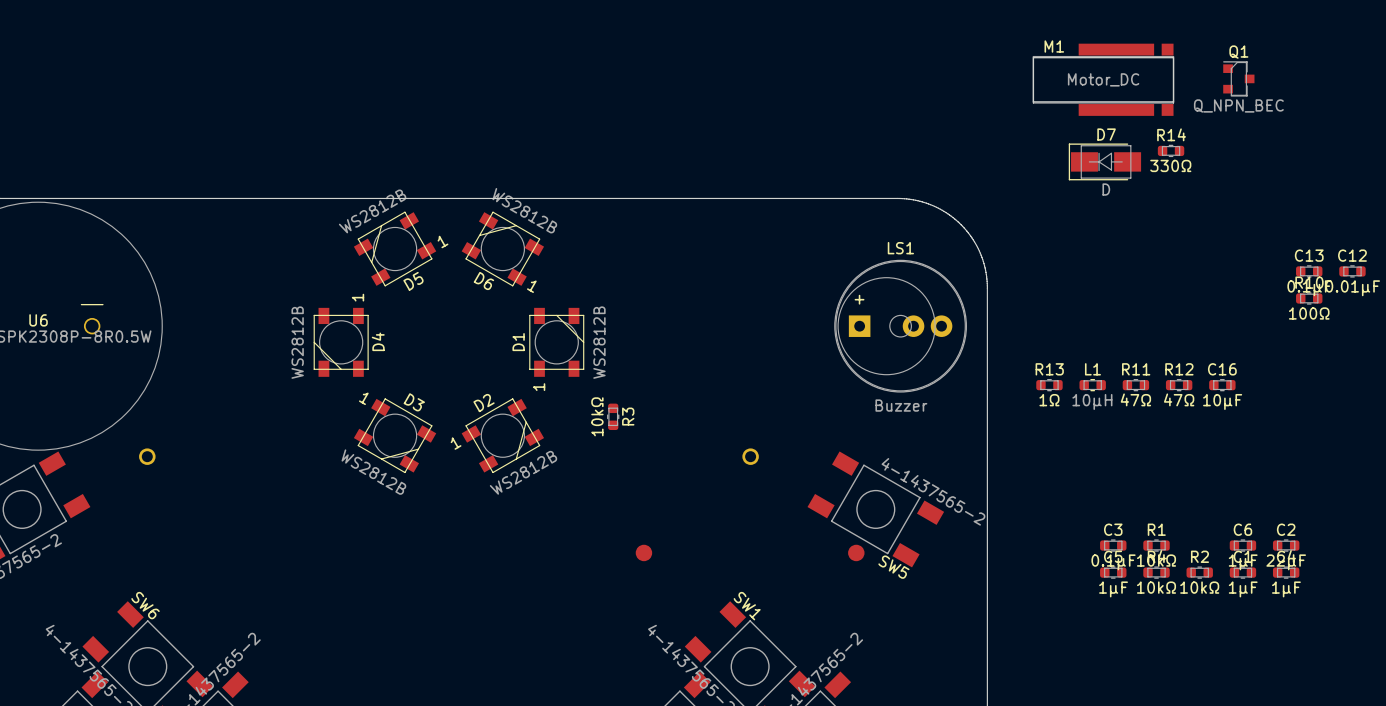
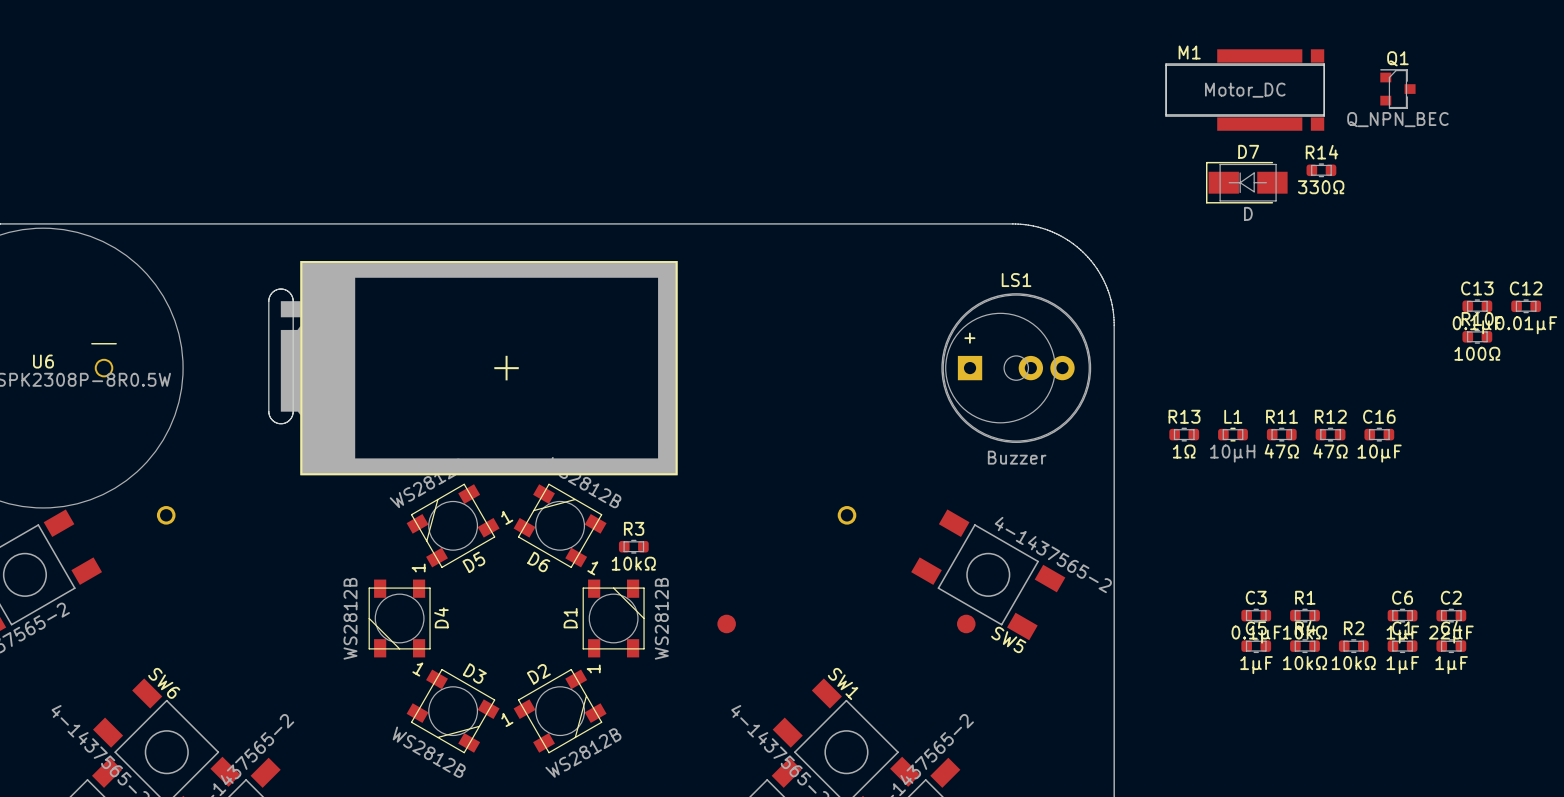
D5 position: (395, 249) -> (453, 525)
D6 position: (502, 249) -> (560, 525)
part: none -> (472, 368)
D4 position: (341, 342) -> (399, 618)
D1 position: (556, 342) -> (613, 618)
R3 value position: 10kΩ (597, 416) -> 10kΩ (633, 563)
R3 rotation: 0° (613, 416) -> 90° clockwise (633, 546)
R3 position: (613, 416) -> (633, 546)
R3 name position: R3 (628, 416) -> R3 (634, 528)
D3 position: (395, 435) -> (453, 711)
D2 position: (502, 435) -> (560, 711)

